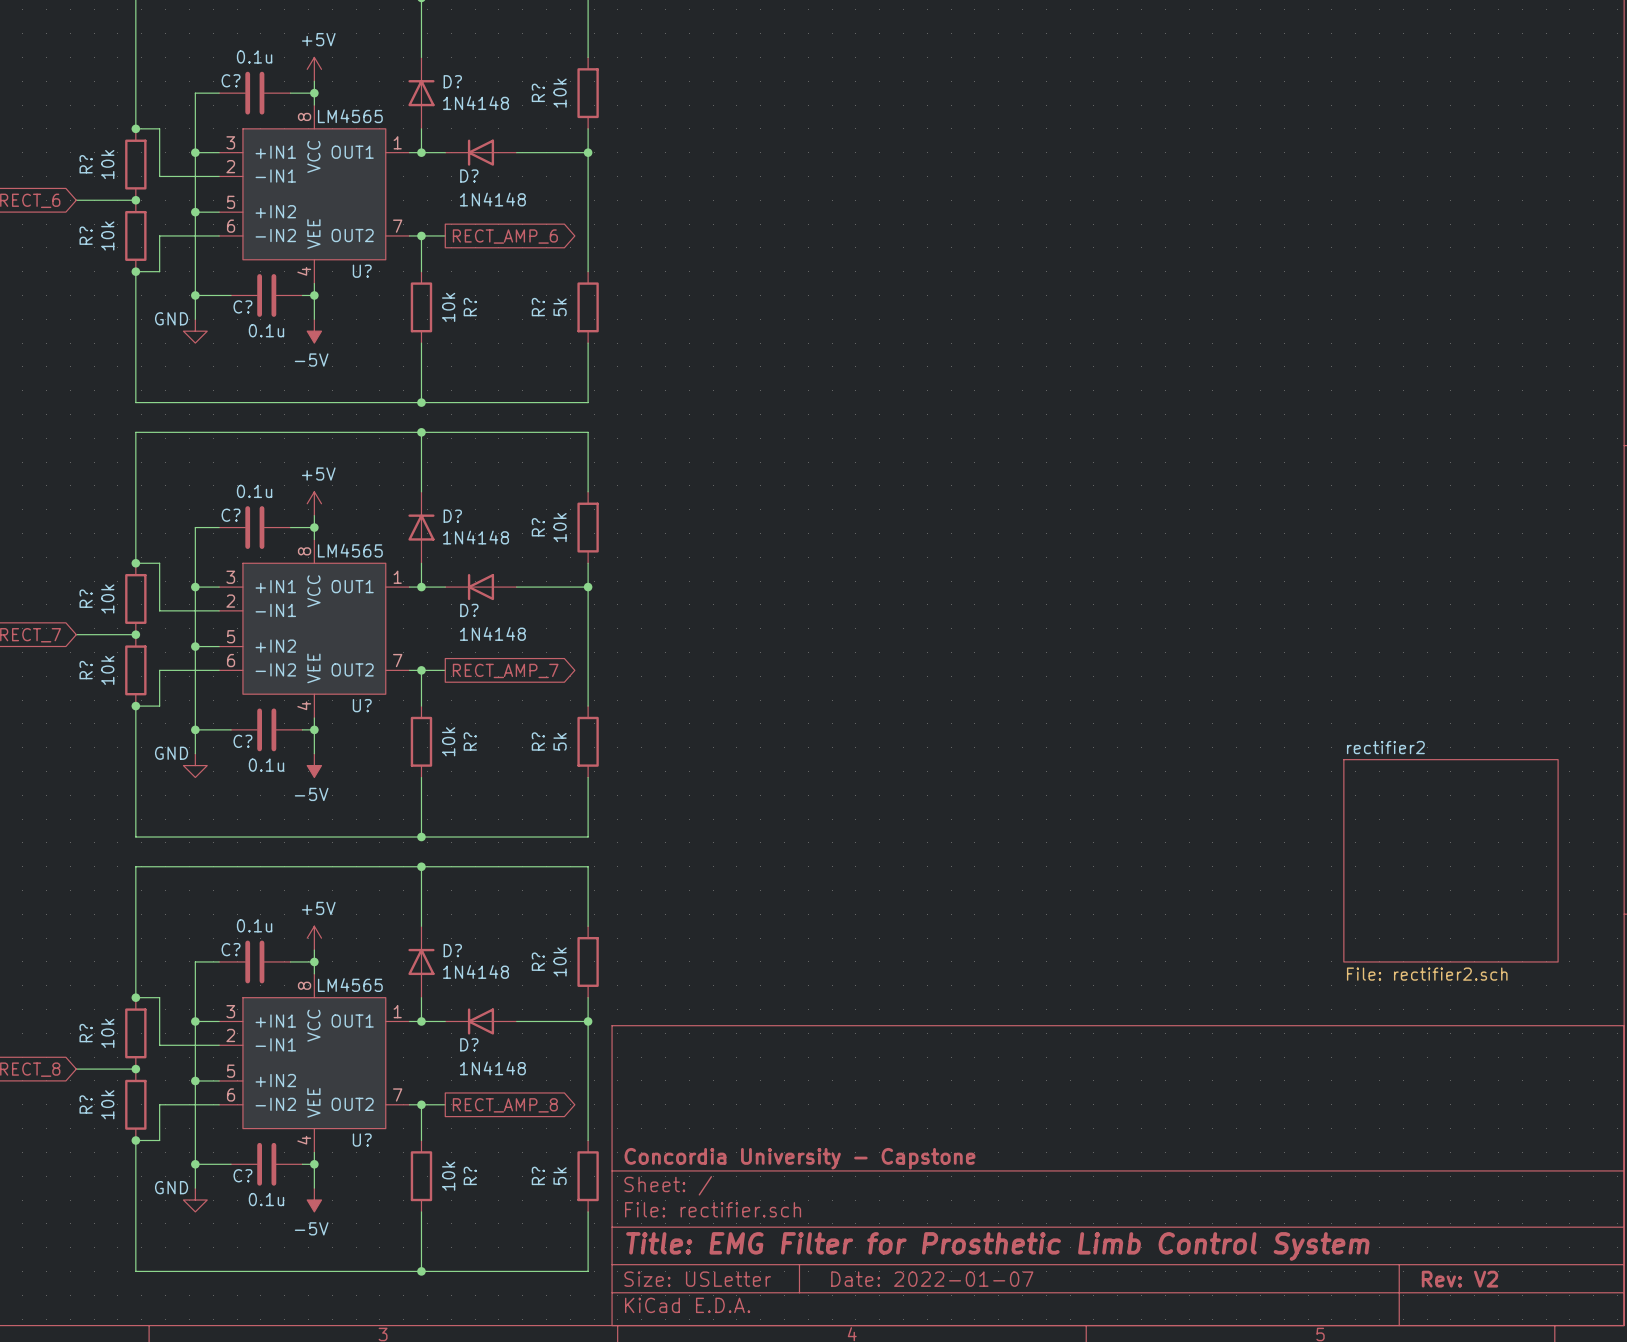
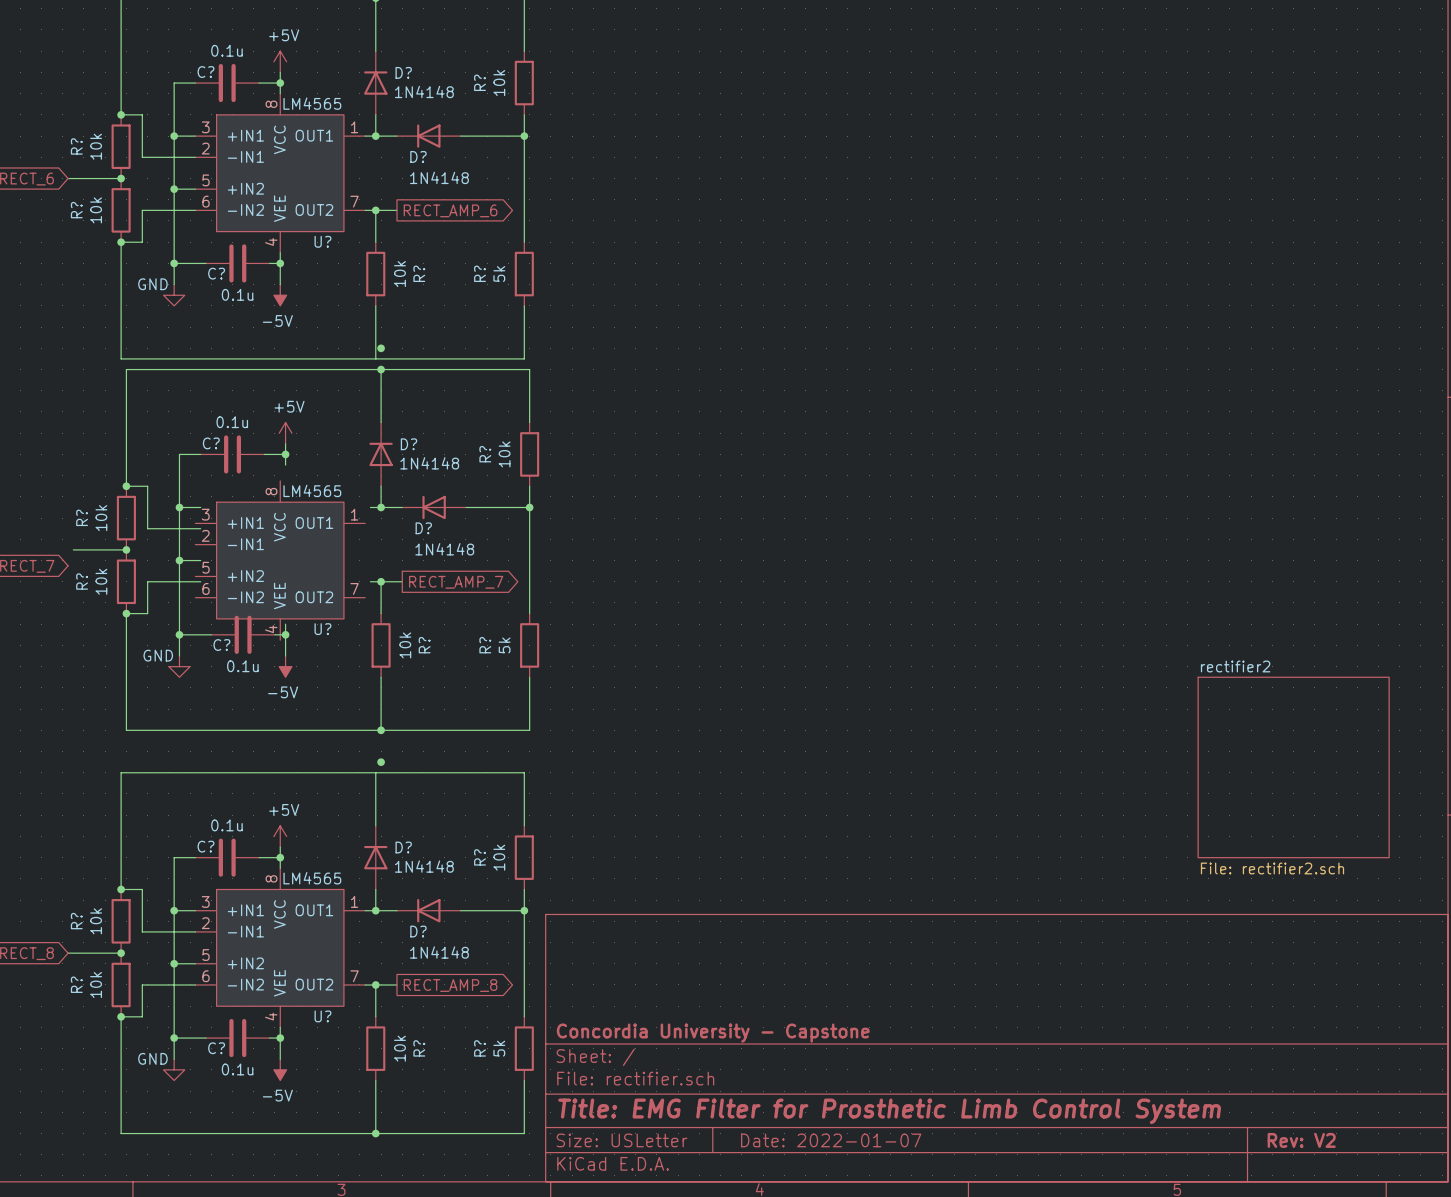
junction: none -> (381, 348)
junction: (421, 402) -> none
junction: none -> (381, 369)
wire: (421, 432) (421, 491) -> (381, 369) (381, 422)
junction: (421, 432) -> none
wire: (588, 491) (588, 432) (135, 432) (135, 563) (159, 563) (159, 610) (219, 610) -> (529, 422) (529, 369) (126, 369) (126, 486) (147, 486) (147, 528) (200, 528)
power symbol position: +5V (314, 503) -> +5V (285, 433)
wire: (314, 515) (314, 539) -> (285, 443) (285, 465)
wire: (219, 527) (195, 527) (195, 753) -> (200, 454) (179, 454) (179, 656)
C? position: (254, 527) -> (232, 454)
wire: (290, 527) (314, 527) -> (264, 454) (285, 454)
junction position: (314, 527) -> (285, 454)
D? position: (421, 527) -> (381, 454)
R? position: (588, 527) -> (529, 454)
junction position: (135, 563) -> (126, 486)
wire: (421, 563) (421, 587) -> (381, 486) (381, 507)
wire: (588, 563) (588, 706) -> (529, 486) (529, 613)
wire: (195, 587) (219, 587) -> (179, 507) (200, 507)
junction position: (195, 587) -> (179, 507)
wire: (409, 587) (445, 587) -> (370, 507) (402, 507)
junction position: (421, 587) -> (381, 507)
D? position: (480, 587) -> (434, 507)
wire: (516, 587) (588, 587) -> (465, 507) (529, 507)
junction position: (588, 587) -> (529, 507)
R? position: (135, 598) -> (126, 518)
wire: (76, 634) (135, 634) -> (73, 549) (126, 549)
junction position: (135, 634) -> (126, 549)
wire: (195, 646) (219, 646) -> (179, 560) (200, 560)
junction position: (195, 646) -> (179, 560)
R? position: (135, 670) -> (126, 581)
wire: (219, 670) (159, 670) (159, 706) (135, 706) (135, 837) (588, 837) (588, 777) -> (200, 581) (147, 581) (147, 613) (126, 613) (126, 730) (529, 730) (529, 677)
wire: (409, 670) (445, 670) -> (370, 581) (402, 581)
wire: (421, 670) (421, 706) -> (381, 581) (381, 613)
junction position: (421, 670) -> (381, 581)
global label position: RECT_AMP_7 (505, 670) -> RECT_AMP_7 (456, 582)
junction position: (135, 706) -> (126, 613)
wire: (314, 717) (314, 753) -> (285, 624) (285, 656)
wire: (195, 729) (231, 729) -> (179, 634) (211, 634)
junction position: (195, 729) -> (179, 634)
C? position: (266, 729) -> (243, 634)
wire: (302, 729) (314, 729) -> (274, 634) (285, 634)
junction position: (314, 729) -> (285, 634)
R? position: (421, 741) -> (381, 645)
R? position: (588, 741) -> (529, 645)
power symbol position: GND (195, 765) -> GND (179, 666)
power symbol position: -5V (314, 765) -> -5V (285, 666)
wire: (421, 777) (421, 837) -> (381, 677) (381, 730)
junction: none -> (381, 730)
junction: (421, 837) -> none
junction: none -> (381, 762)
junction: (421, 866) -> none

